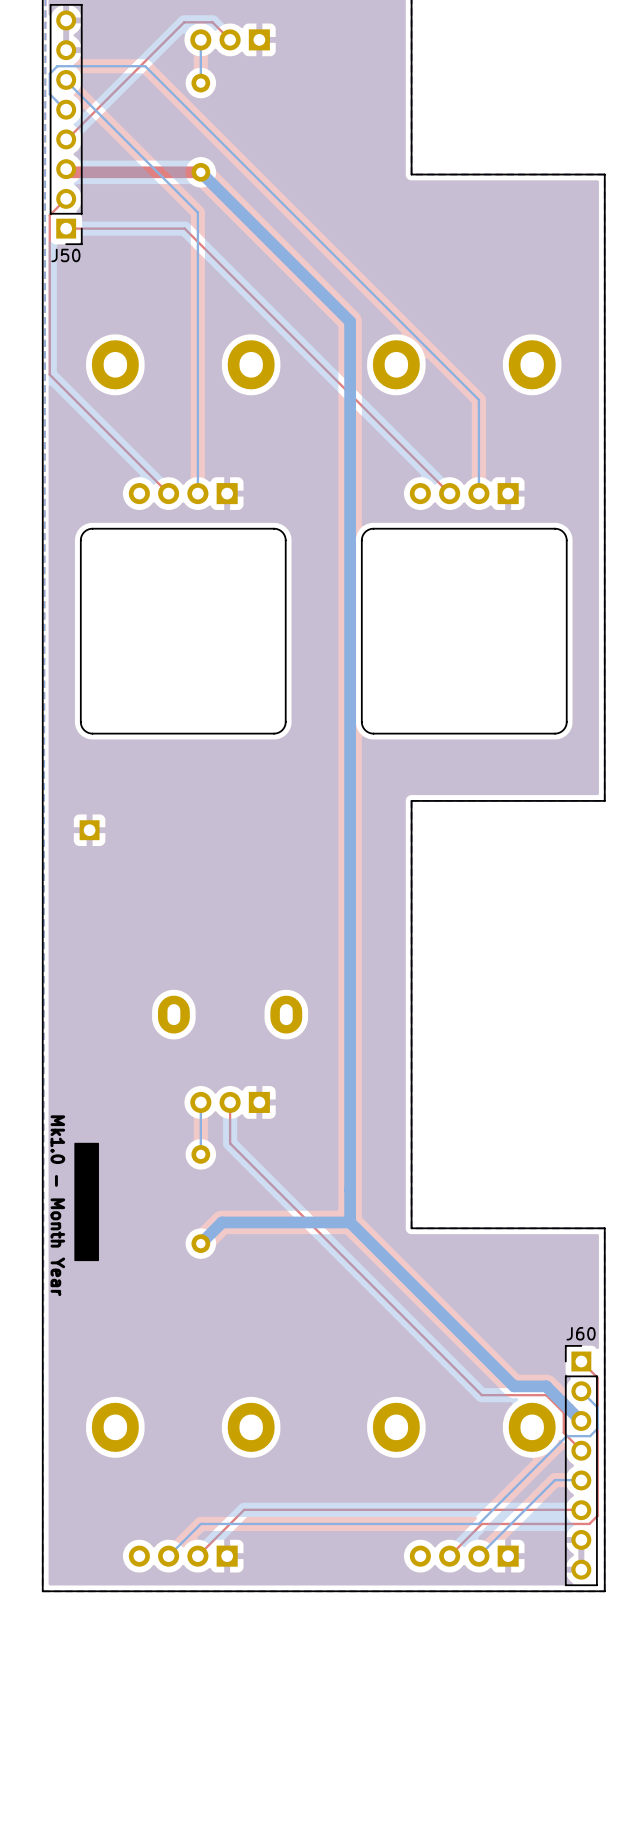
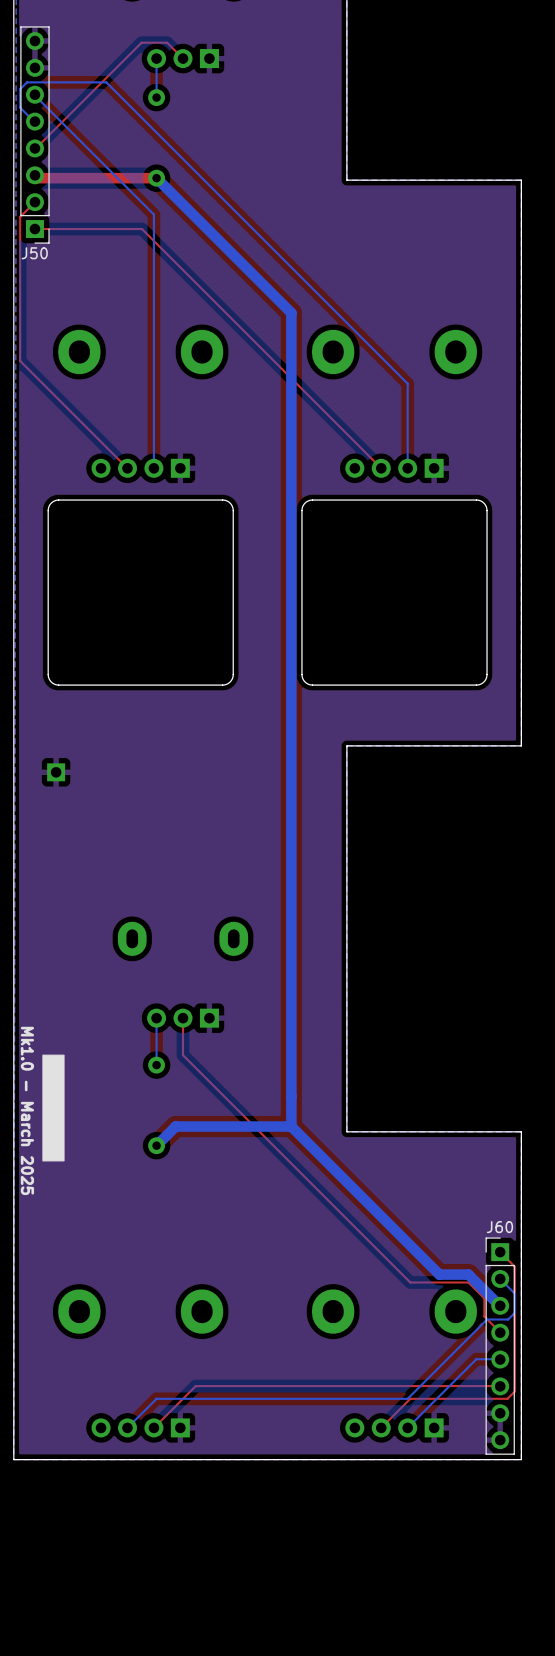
text: Mk1.0 - Month Year (57, 1205) -> Mk1.0 - March 2025 (27, 1110)

